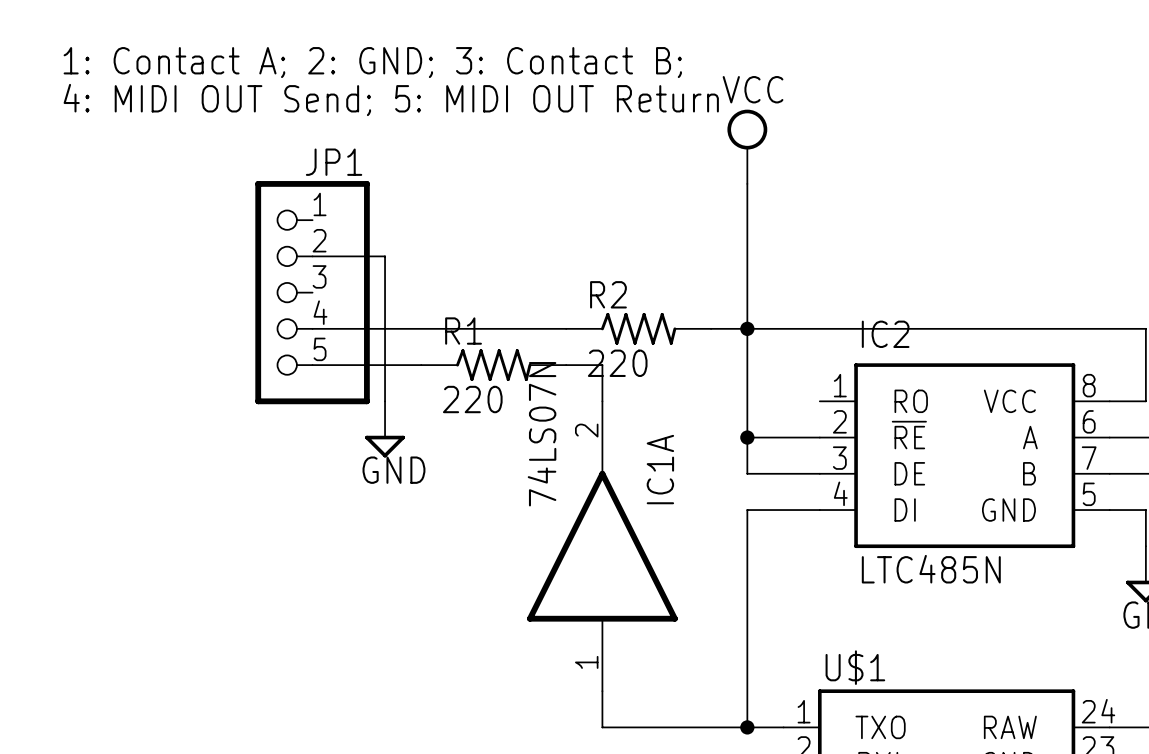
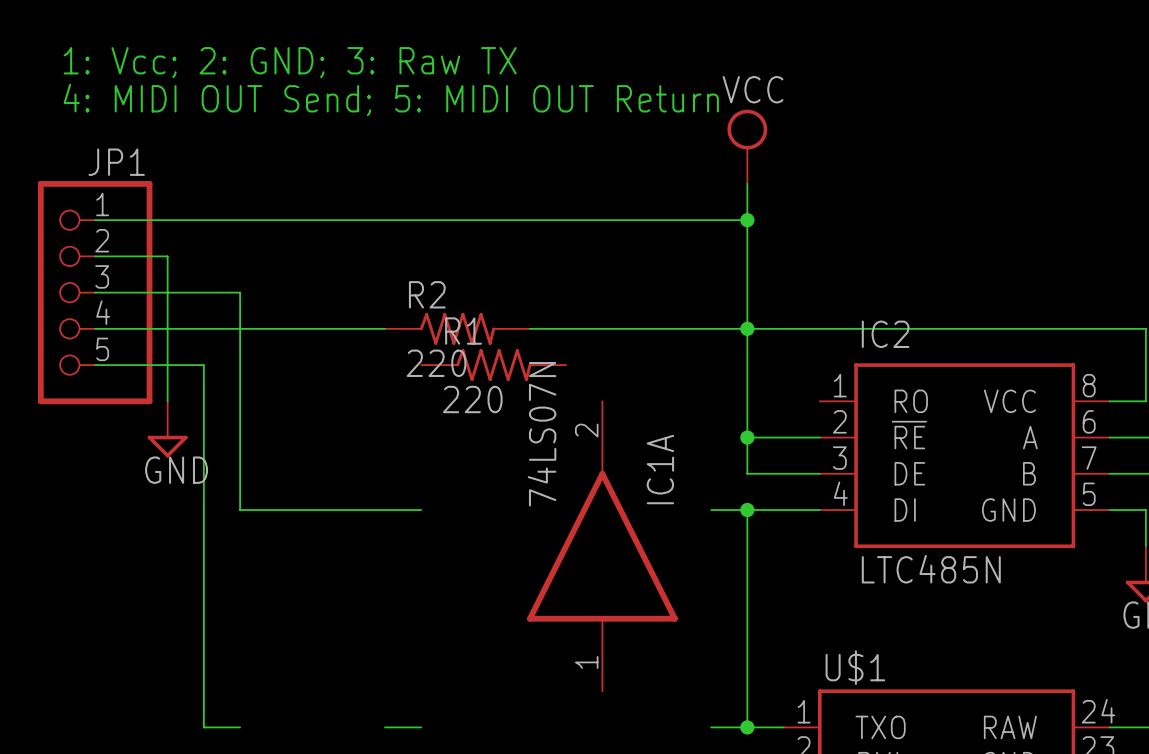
text: 1: Contact A; 2: GND; 3: Contact B; (372, 62) -> 1: Vcc; 2: GND; 3: Raw TX (290, 62)
wire: none -> (95, 220) (747, 220)
junction: none -> (747, 220)
wire: (312, 256) (385, 256) (385, 401) -> (95, 256) (167, 256) (167, 401)
wire: none -> (95, 292) (240, 292) (240, 510) (421, 510)
JP1 position: (312, 292) -> (95, 292)
wire: none -> (95, 328) (312, 328)
R2 position: (638, 328) -> (457, 328)
wire: none -> (95, 365) (203, 365) (203, 727) (240, 727)
wire: (312, 365) (421, 365) -> none
wire: (566, 365) (602, 365) (602, 401) -> none
power symbol position: GND (385, 429) -> GND (167, 429)
wire: none -> (711, 510) (747, 510)
junction: none -> (747, 510)
wire: (602, 691) (602, 727) (711, 727) -> none
wire: none -> (385, 727) (421, 727)

